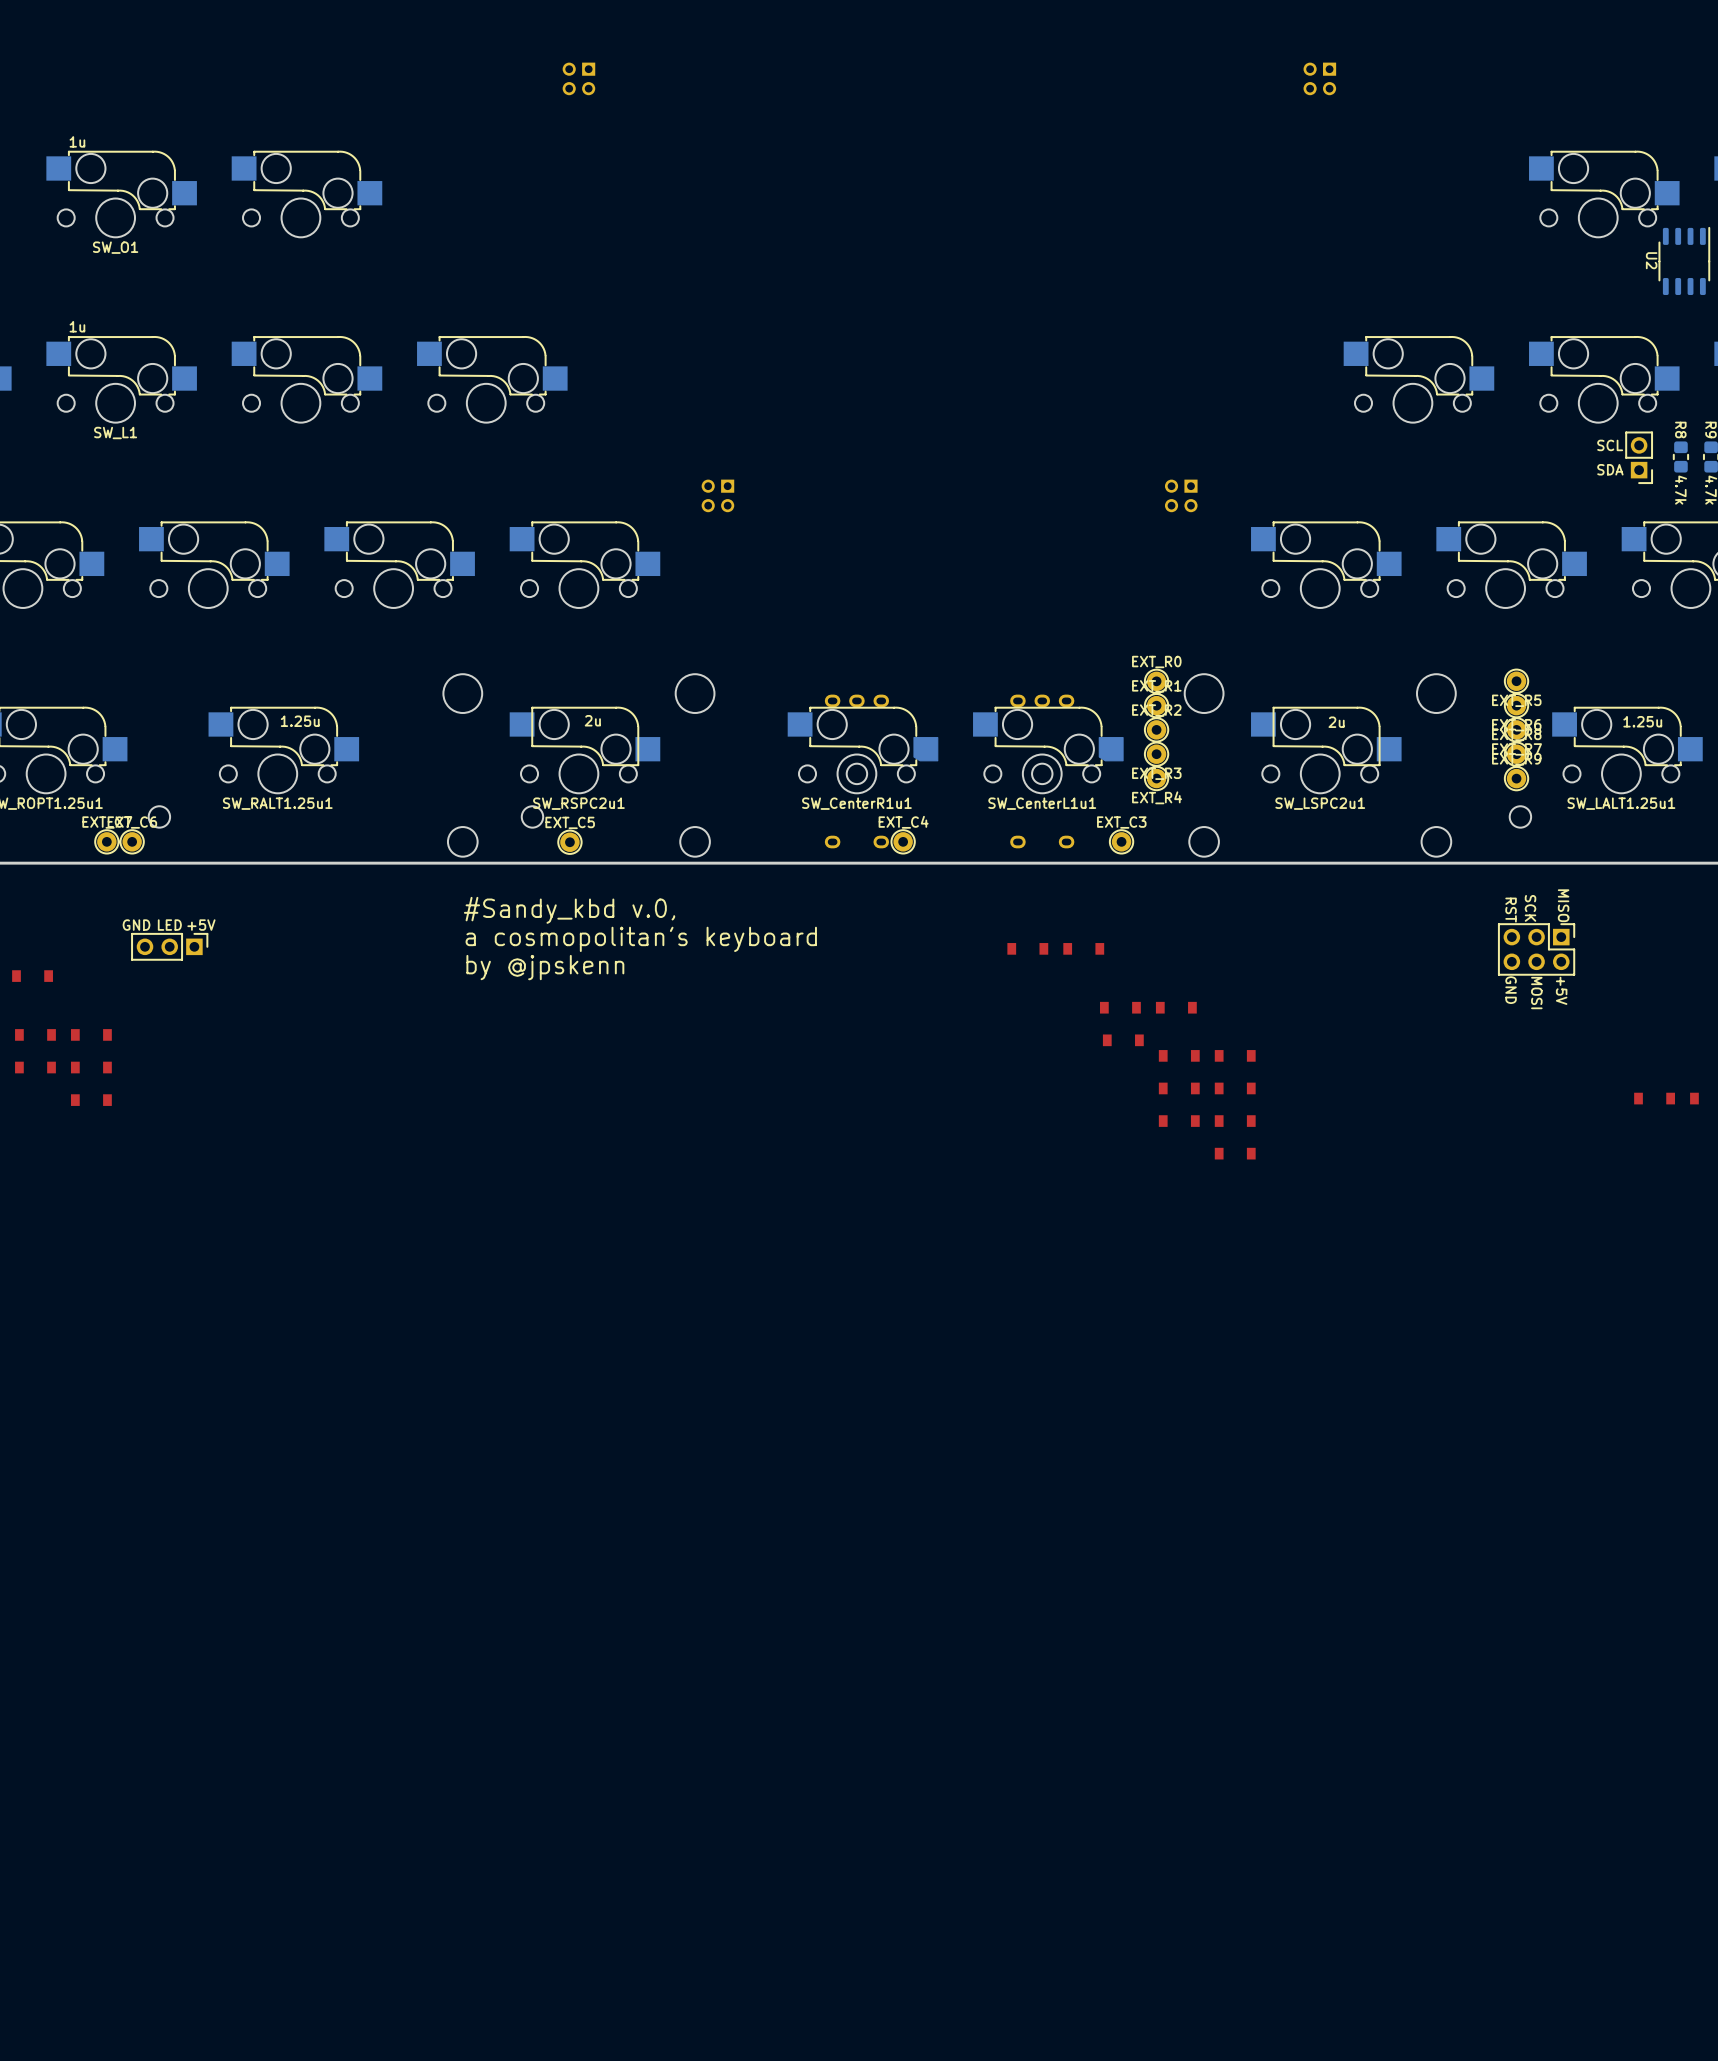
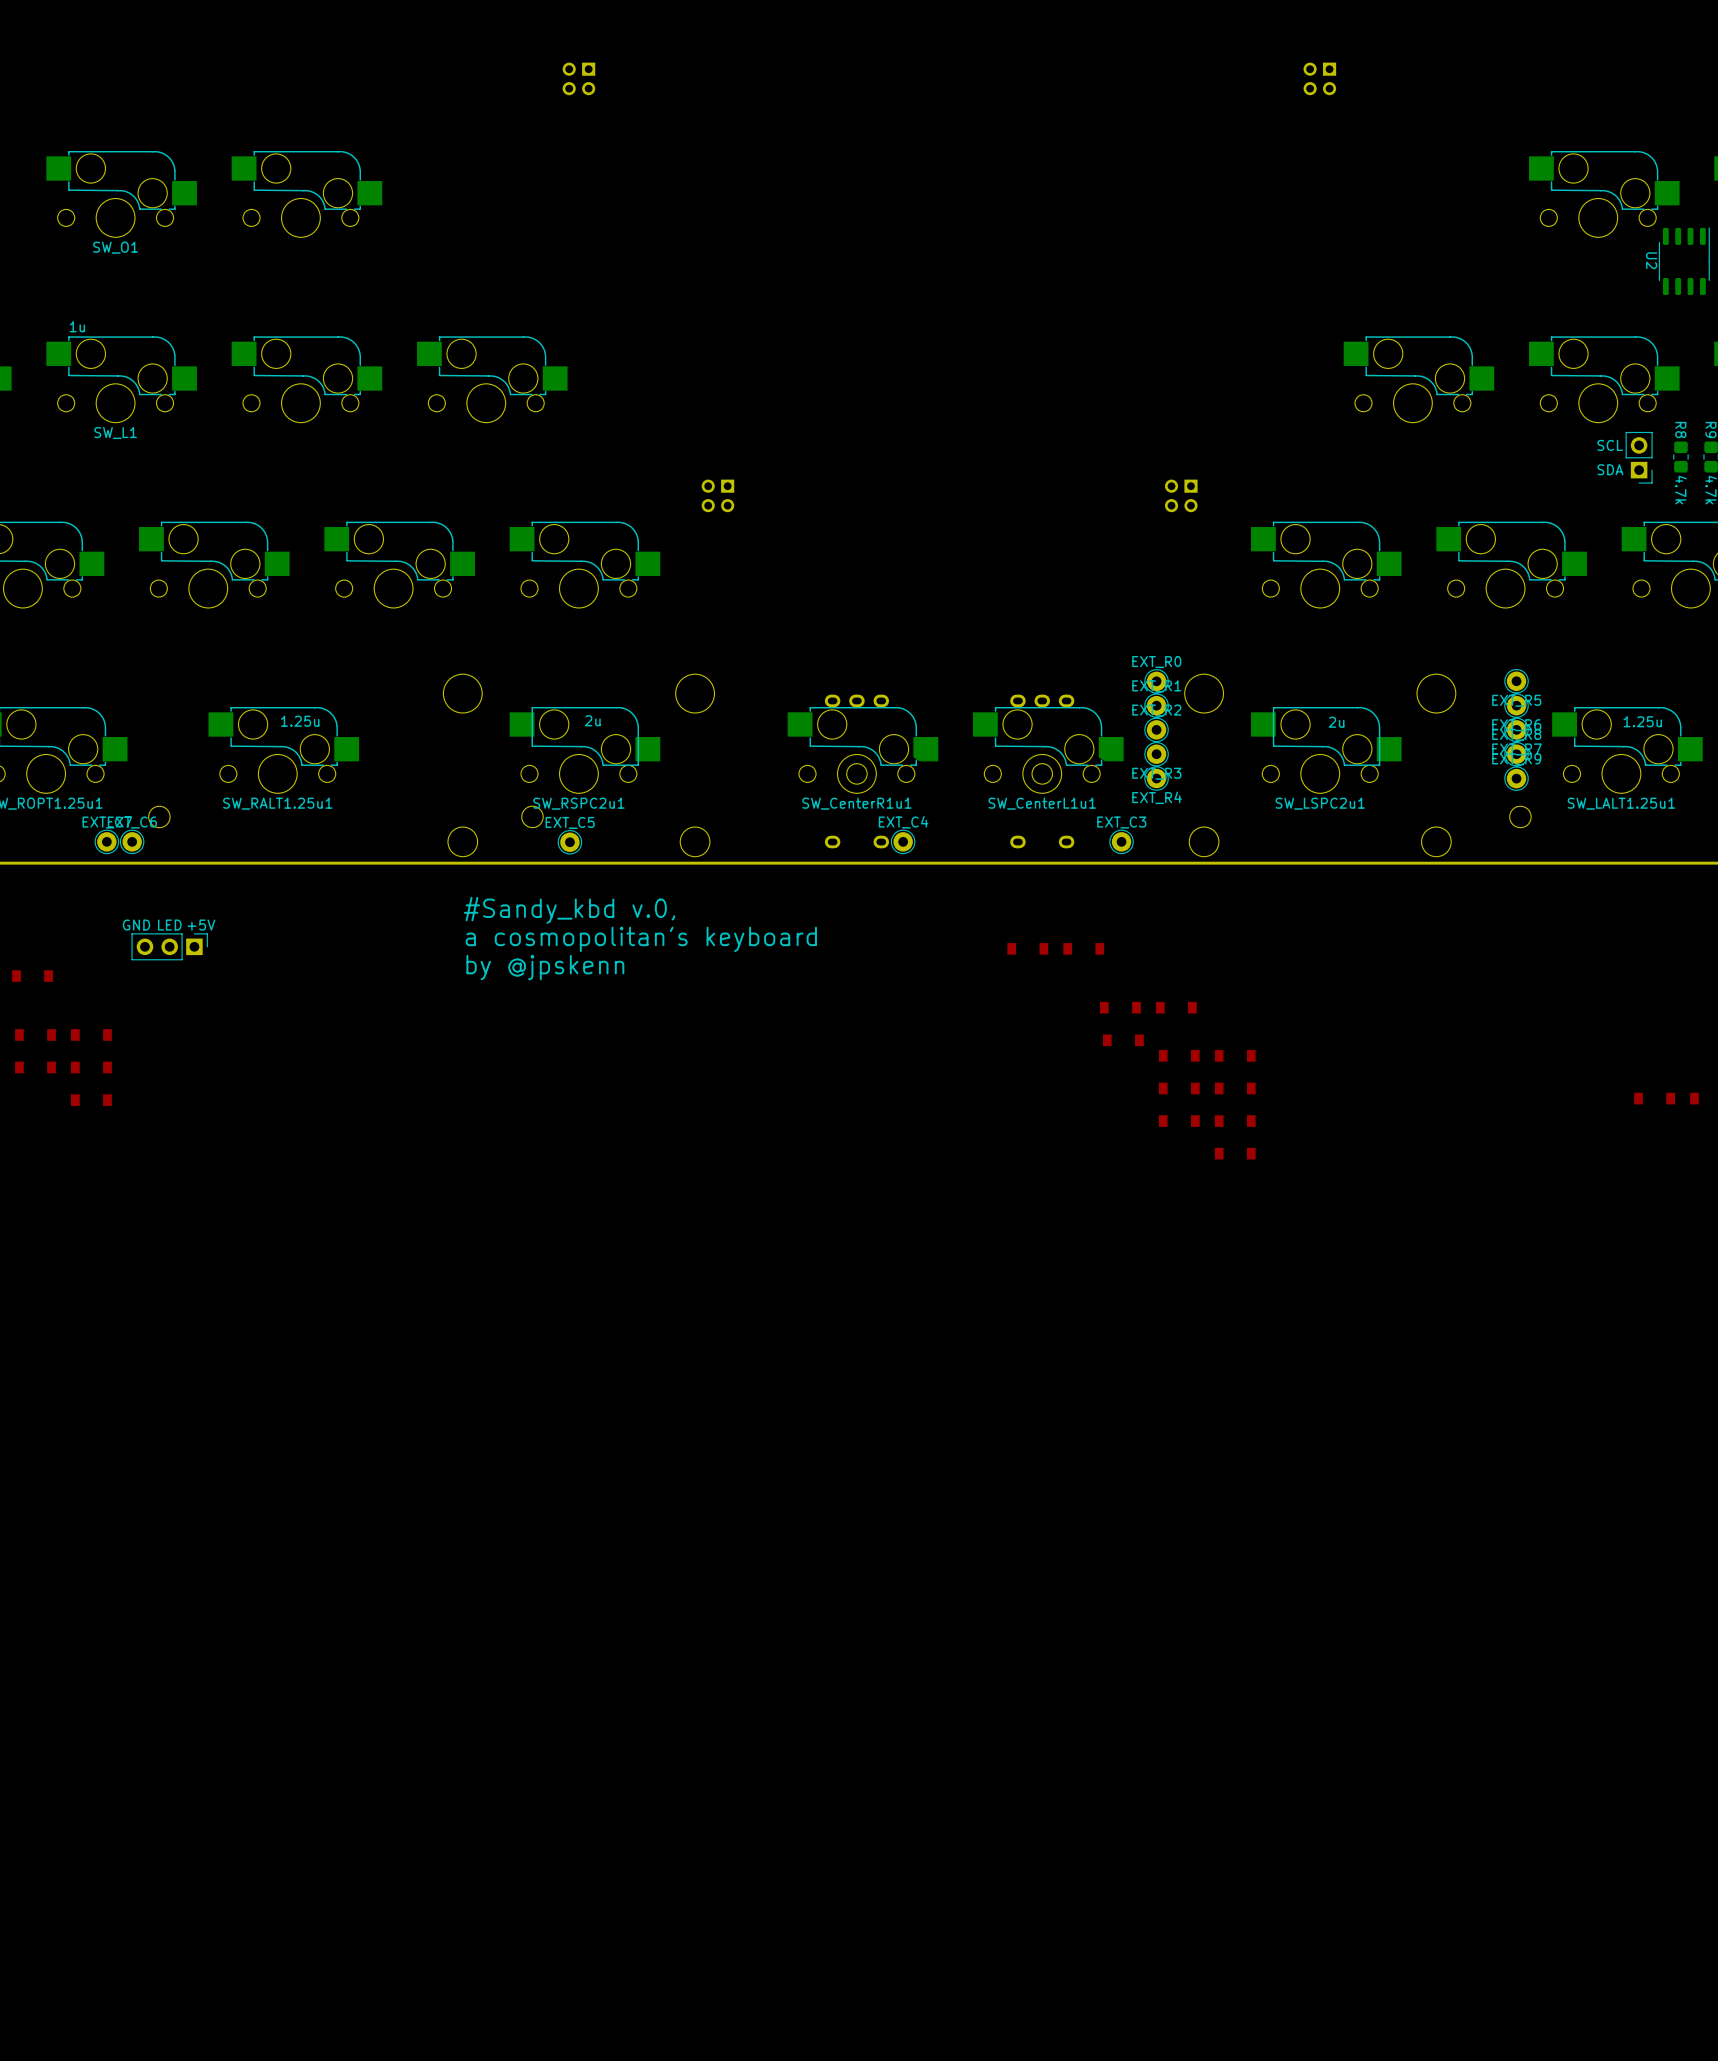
SW_O1 text: 1u (77, 141) -> none
part: (1536, 949) -> none

